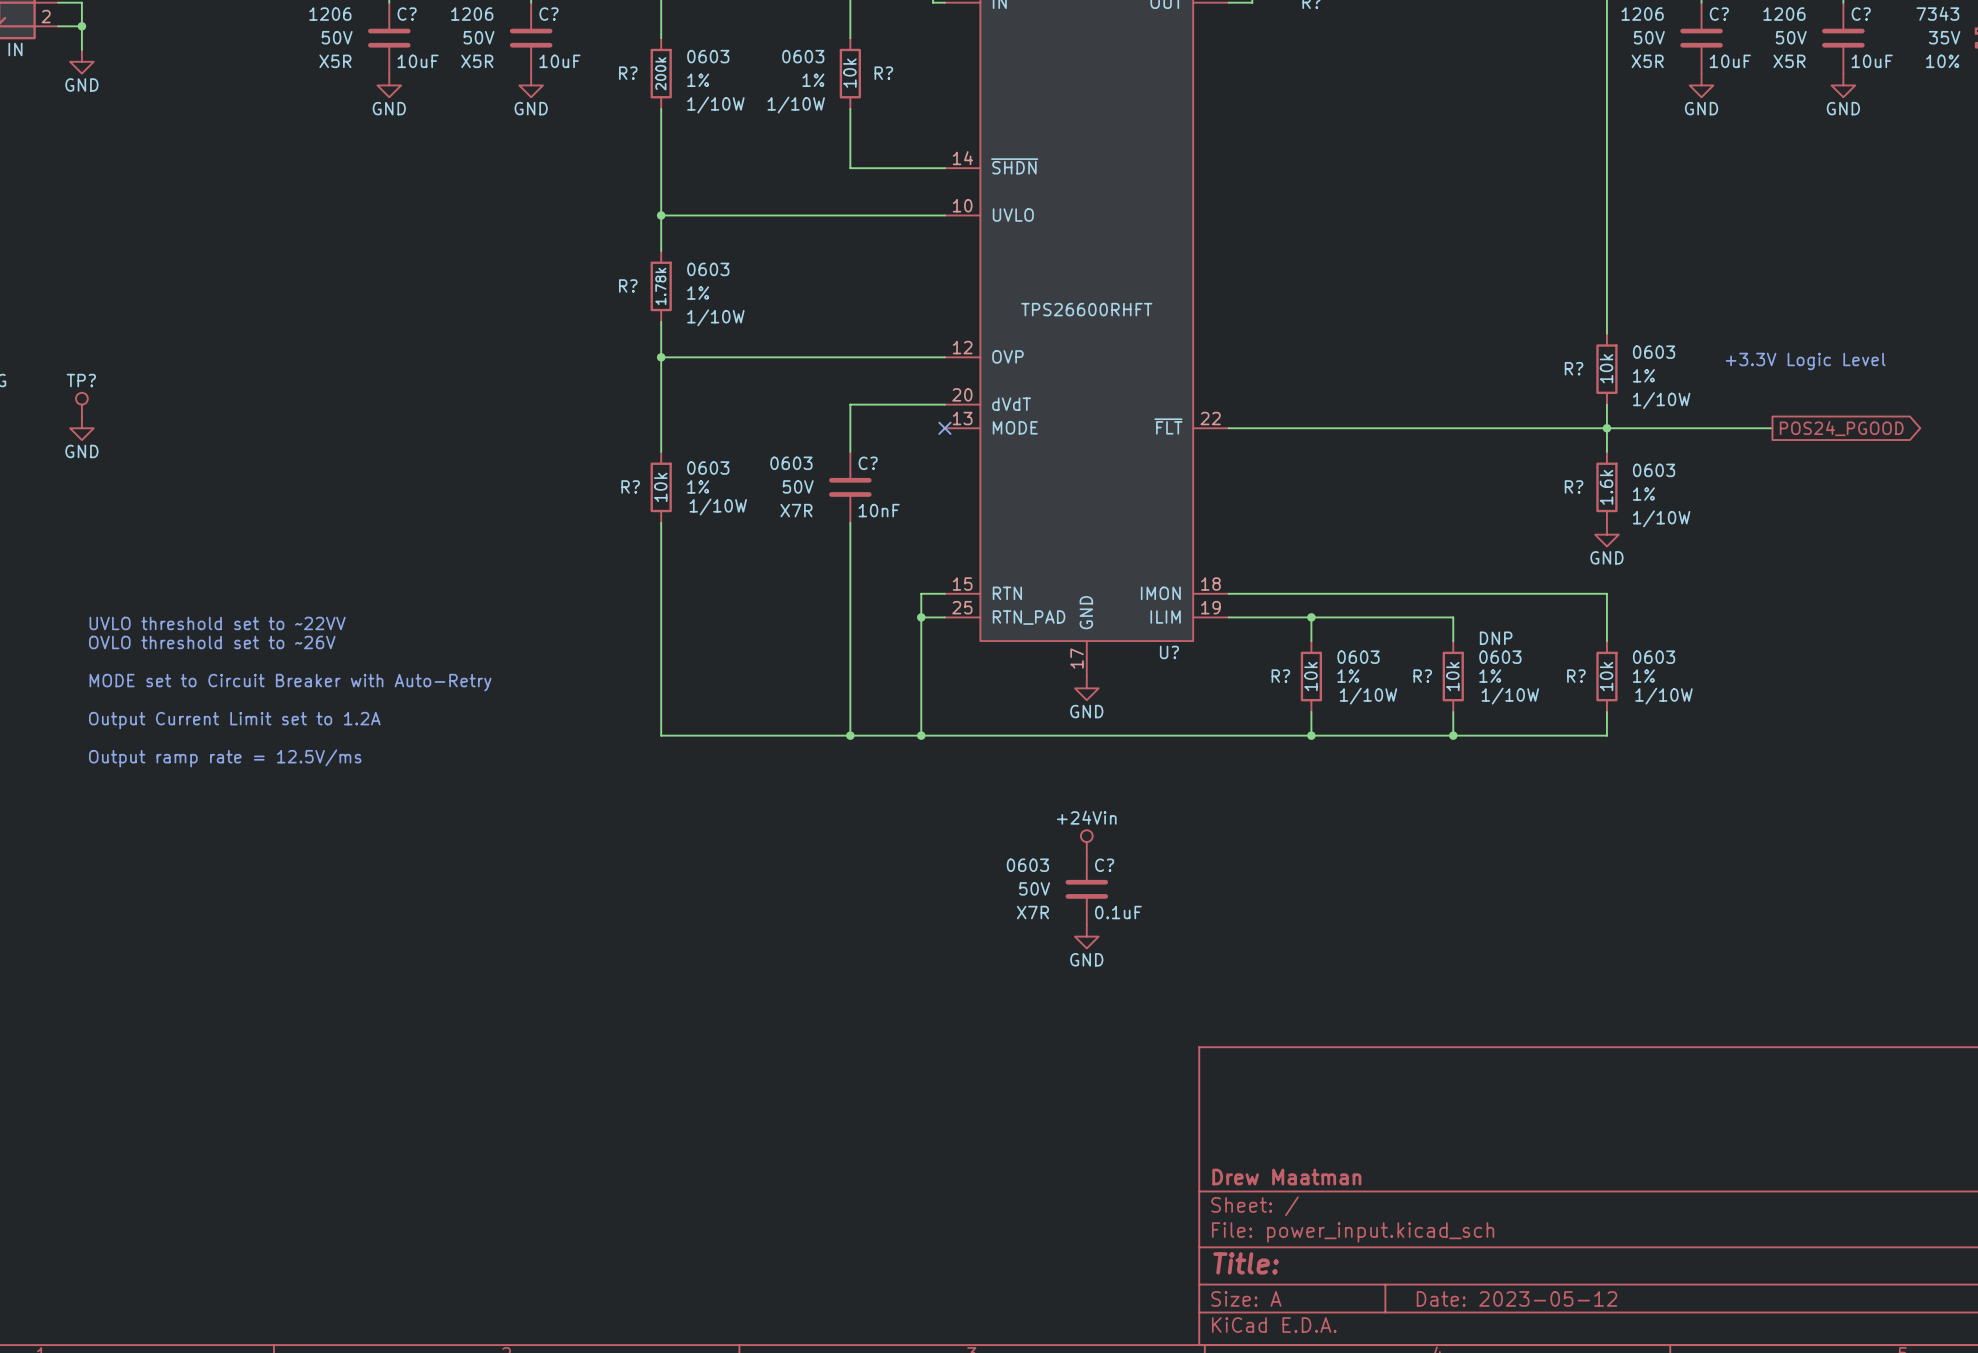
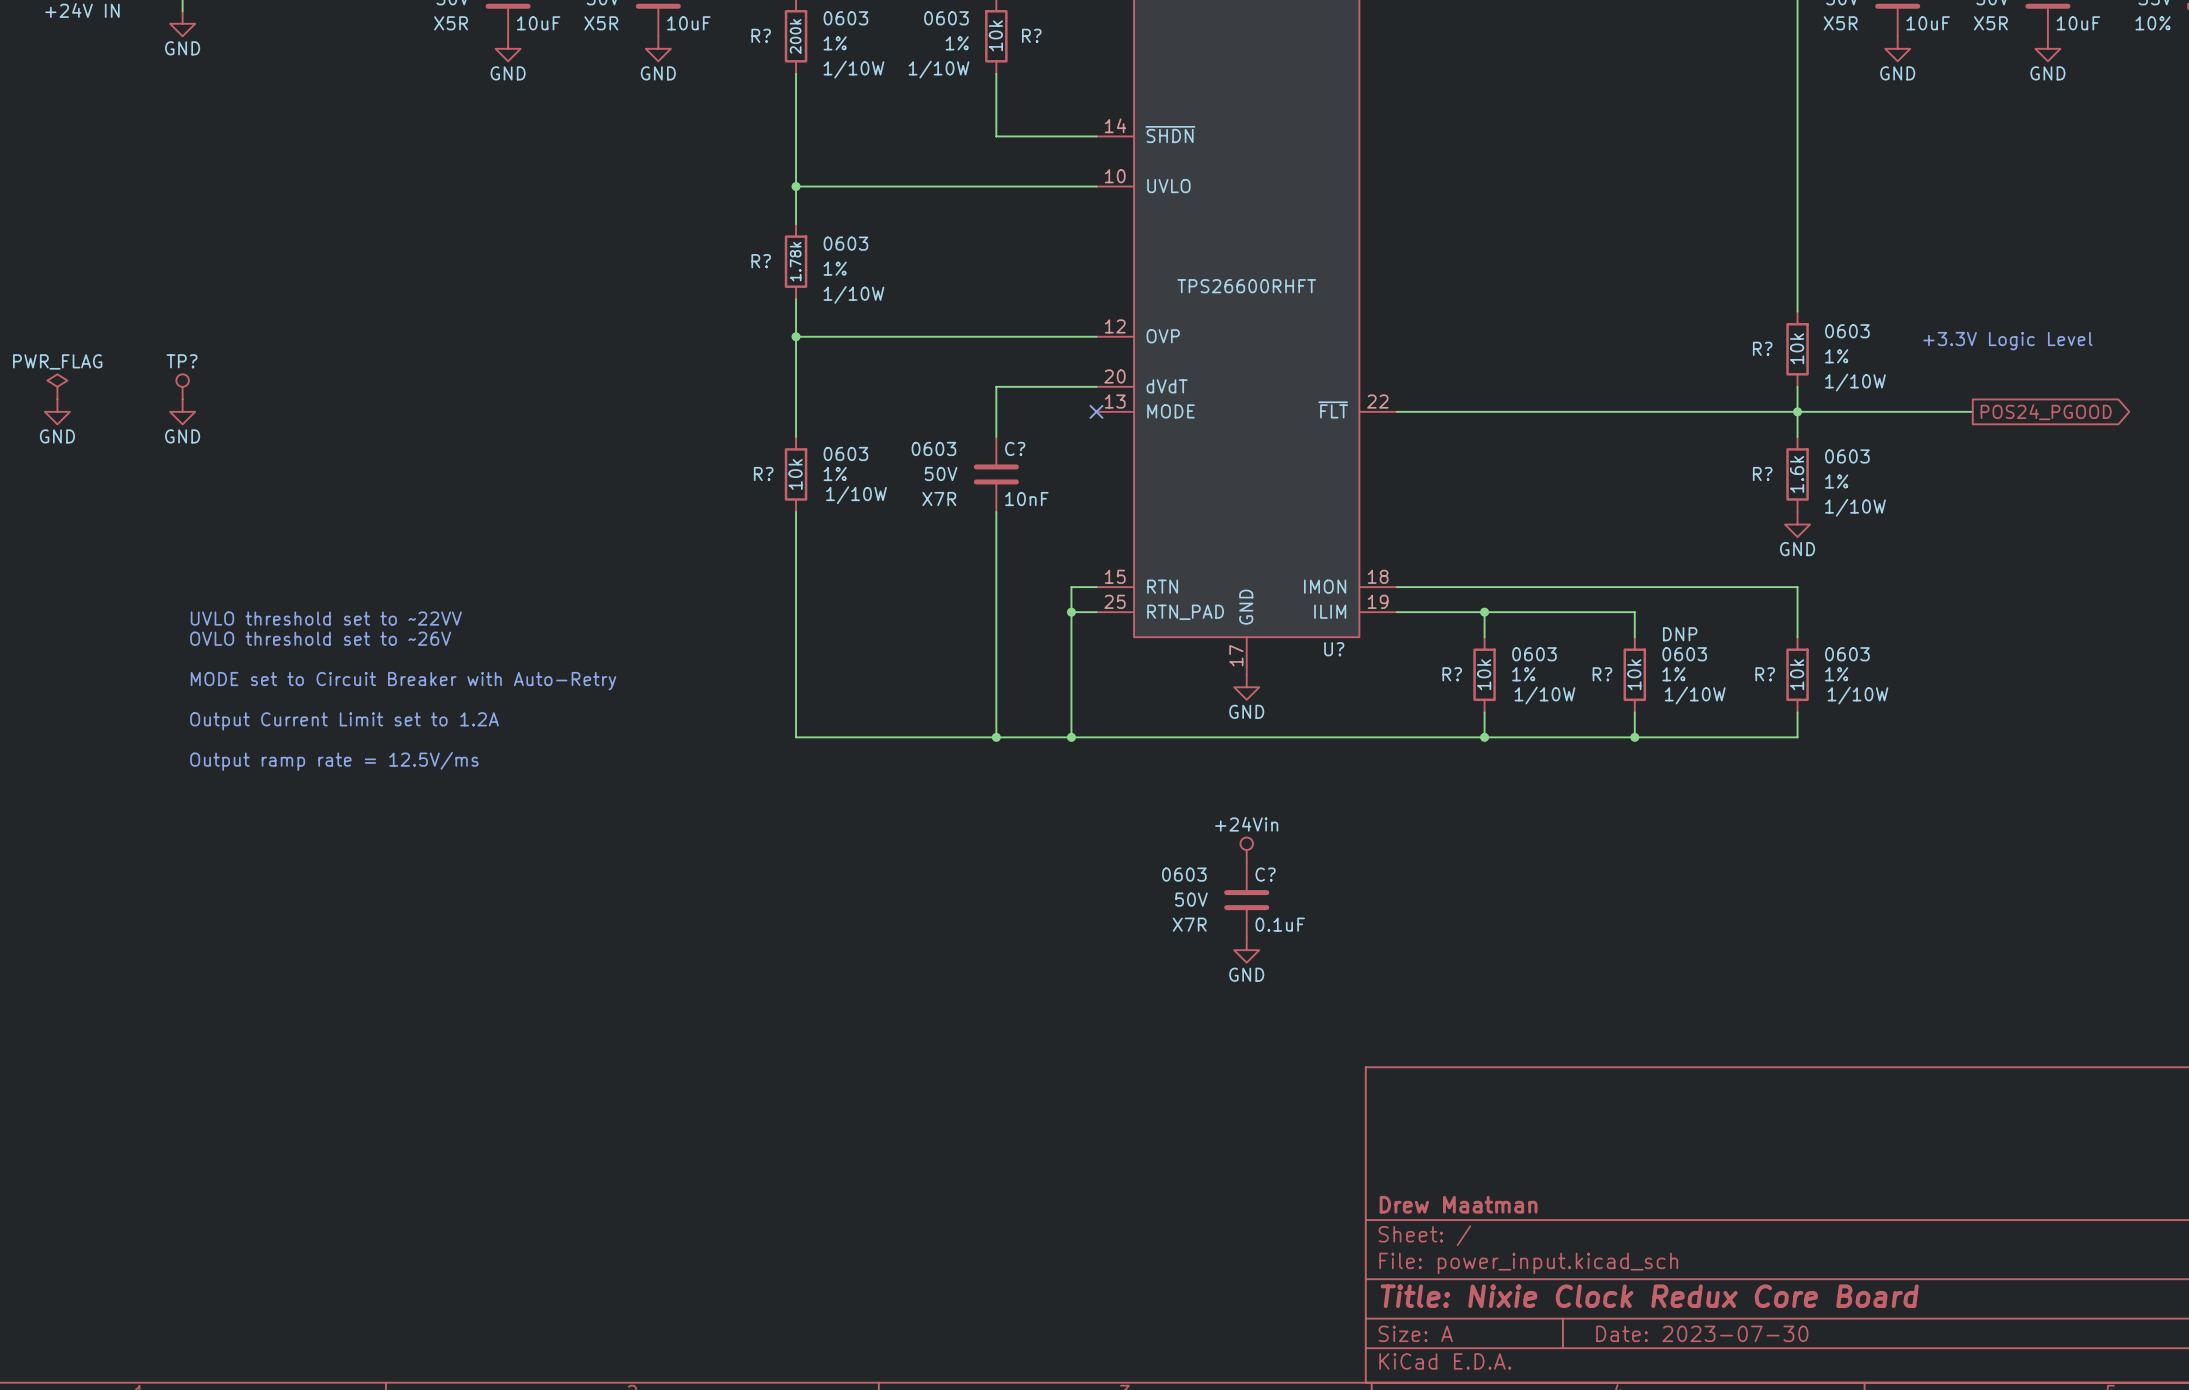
title block: Title: (1246, 1263) -> Title: Nixie Clock Redux Core Board (1649, 1296)
title block: Date: 2023-05-12 (1516, 1298) -> Date: 2023-07-30 (1702, 1333)

